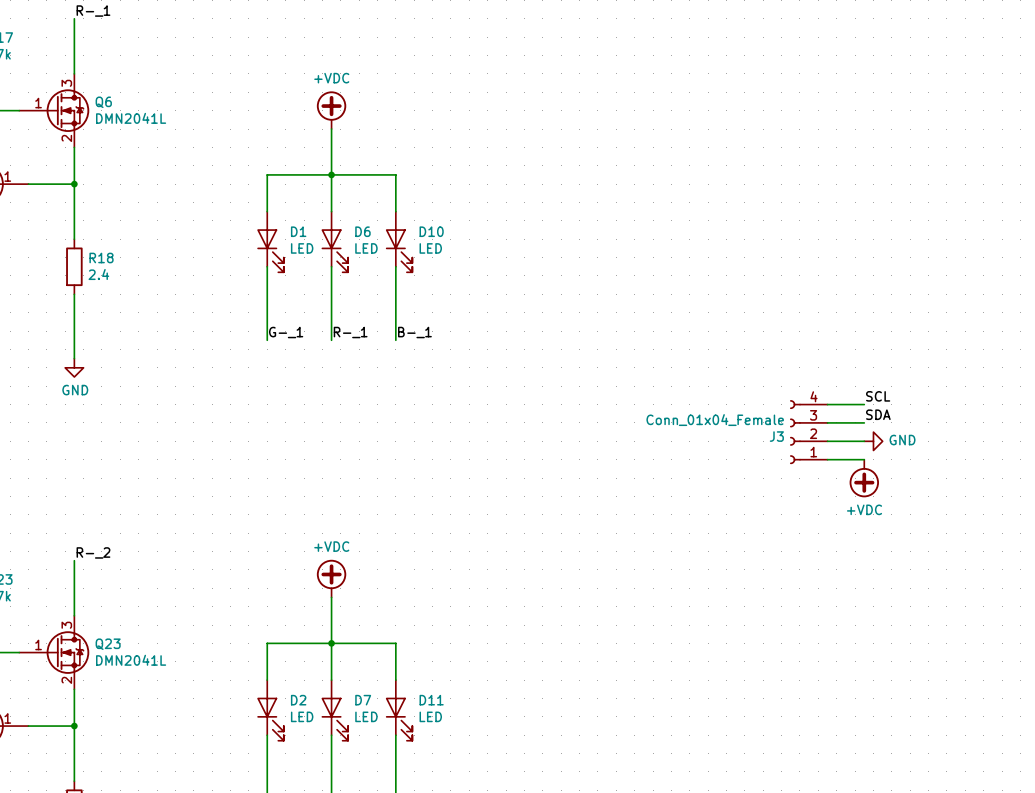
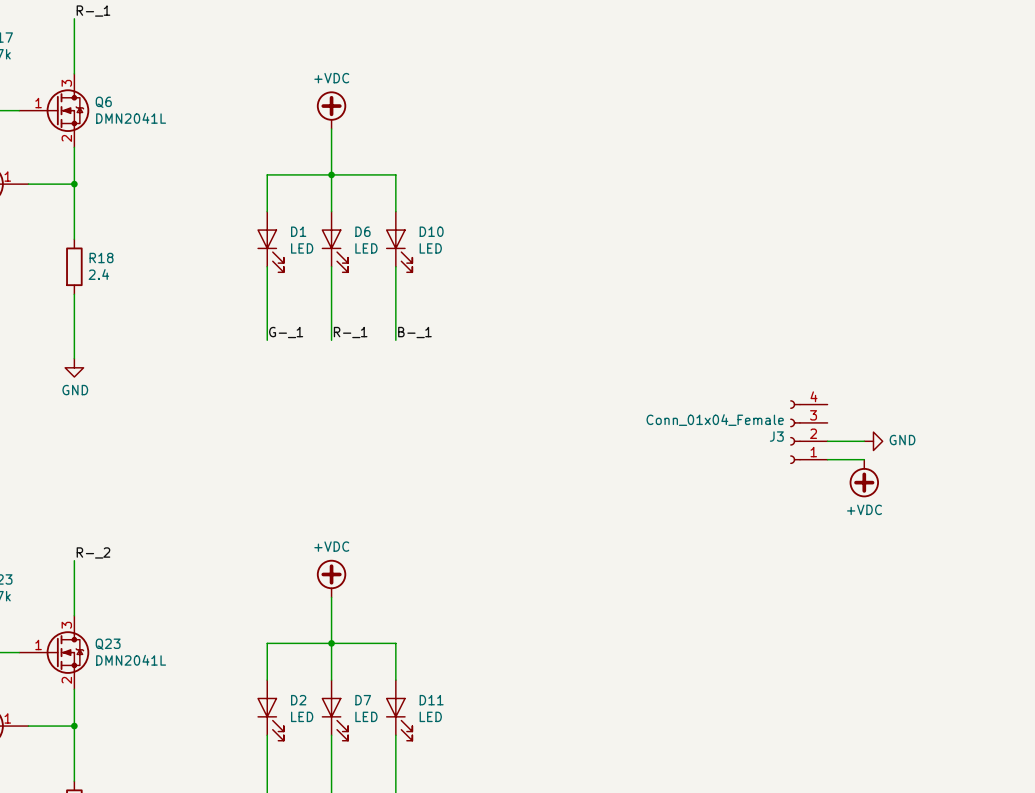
label: SCL (878, 396) -> none
wire: (827, 404) (864, 404) -> none
label: SDA (878, 414) -> none
wire: (827, 422) (864, 422) -> none

